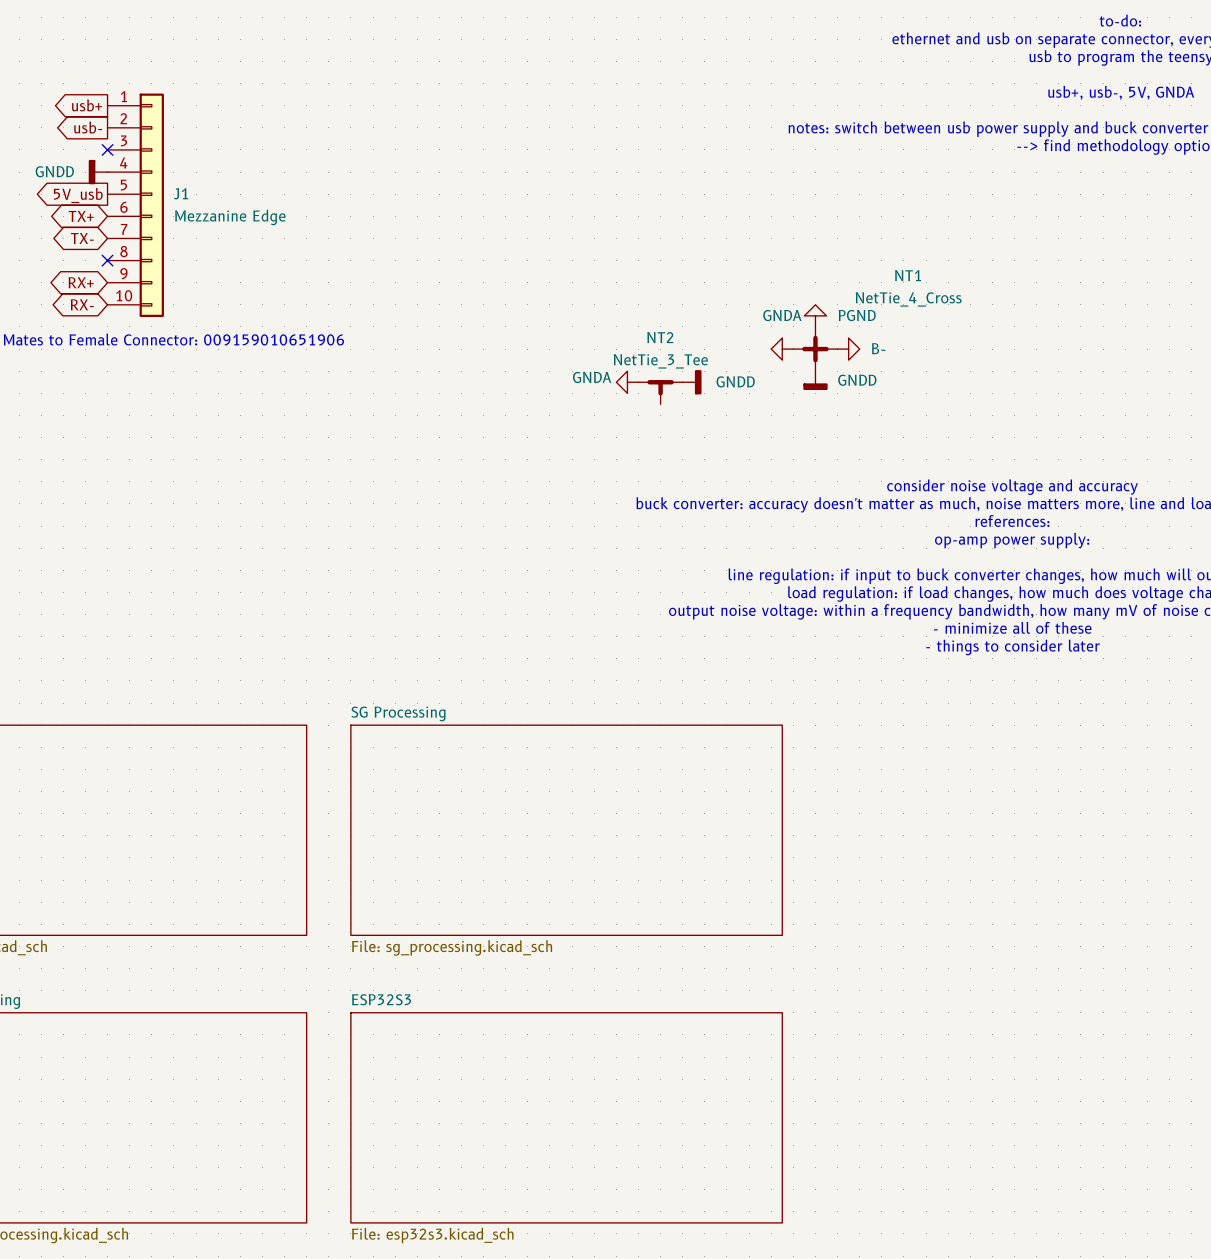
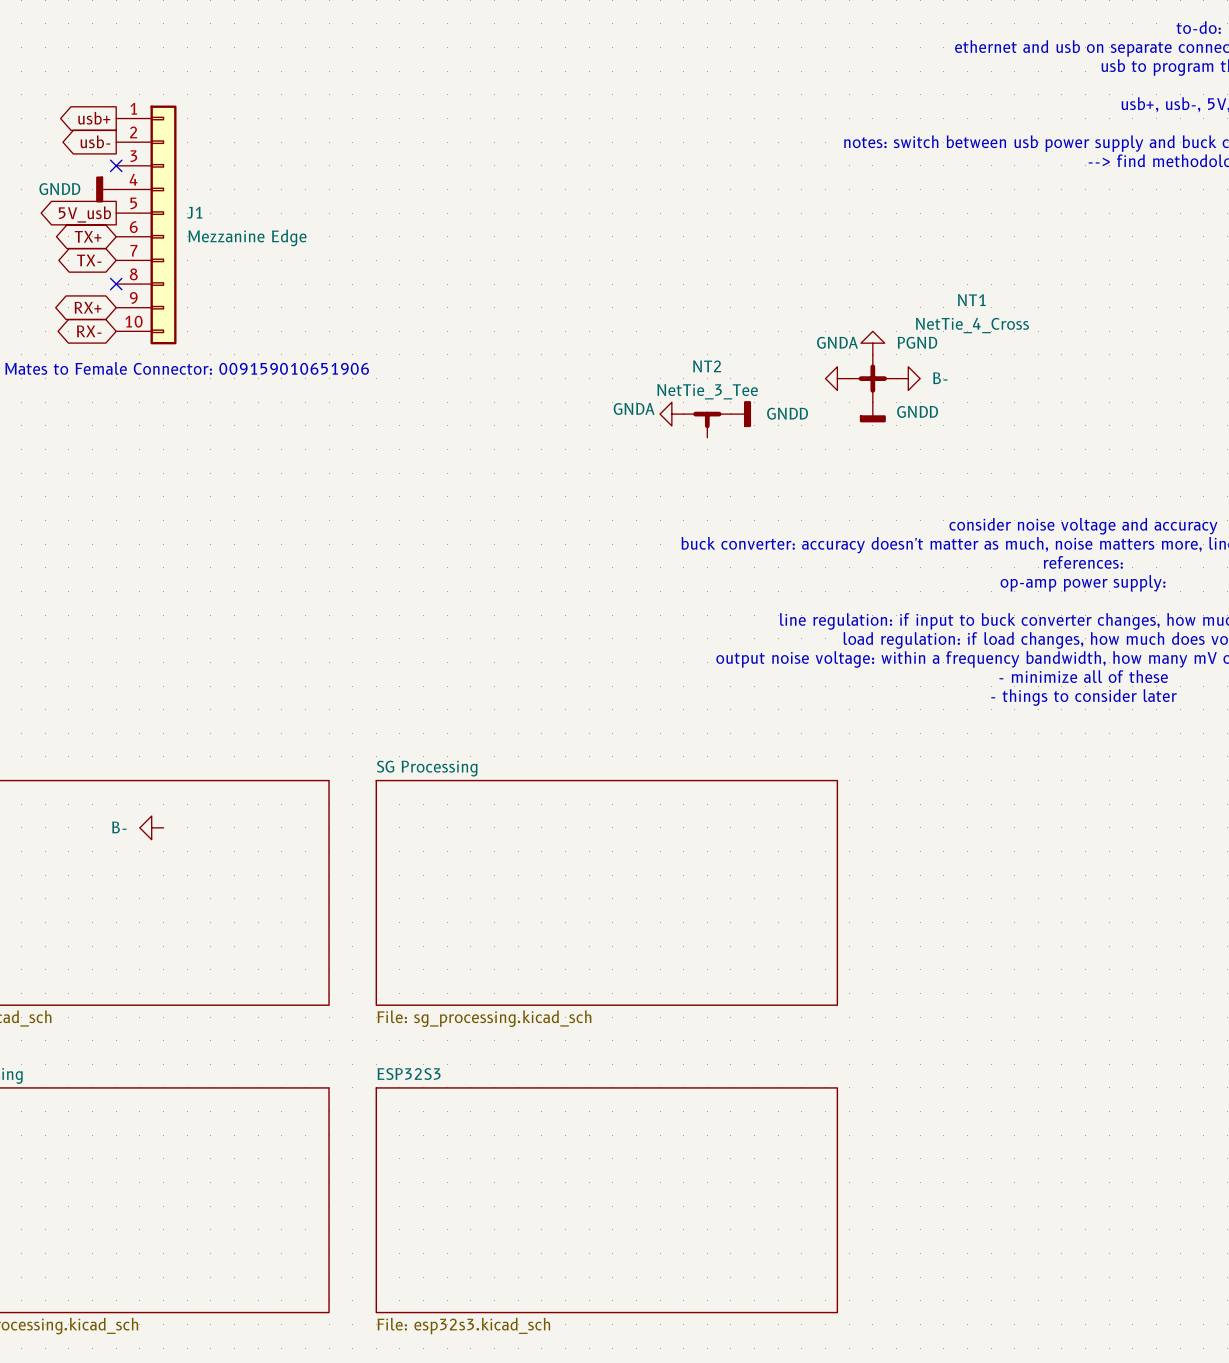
power symbol: none -> B- (151, 827)

